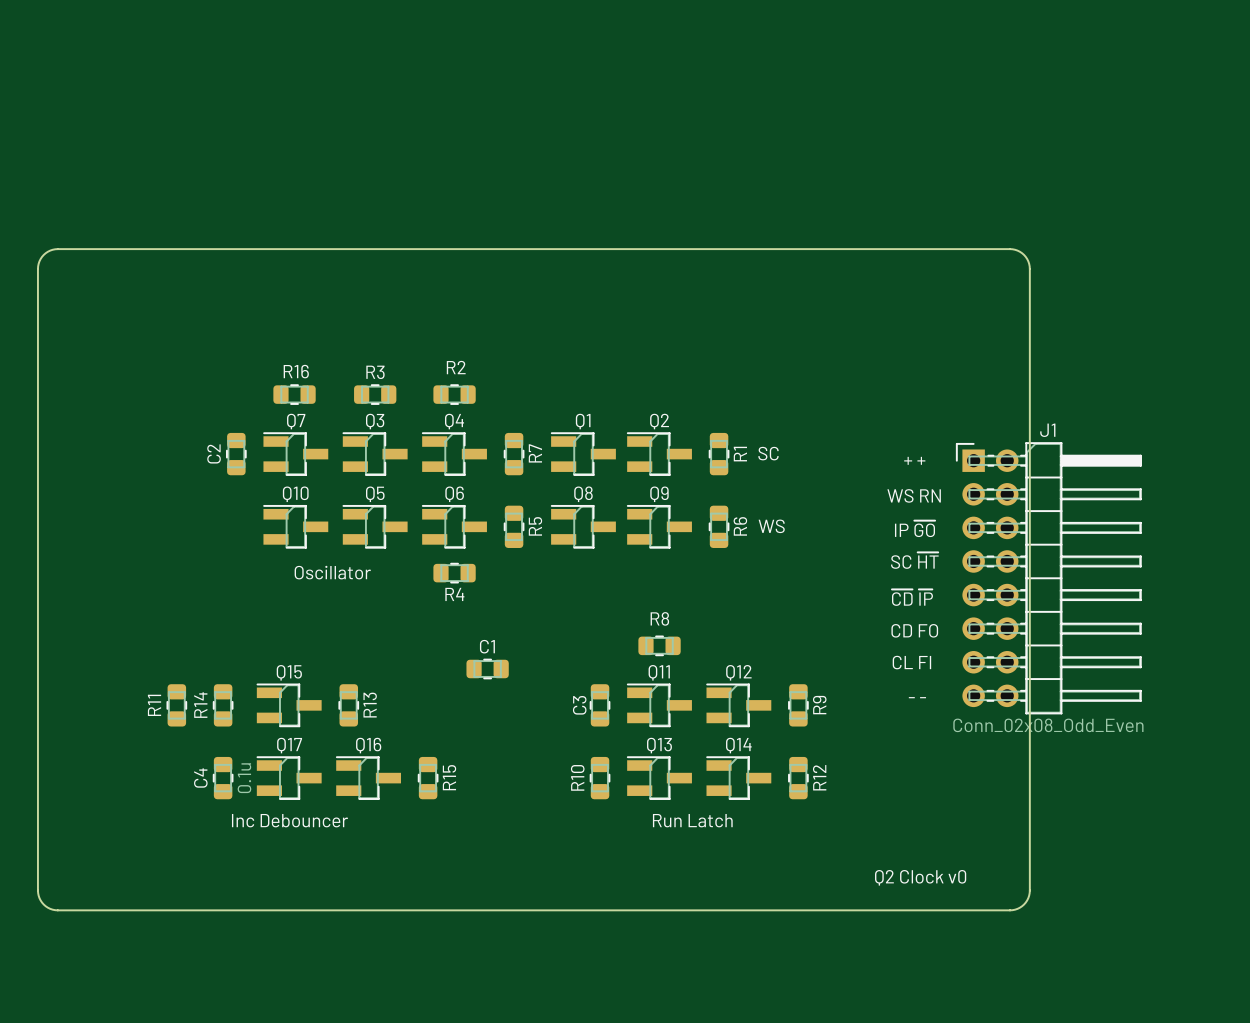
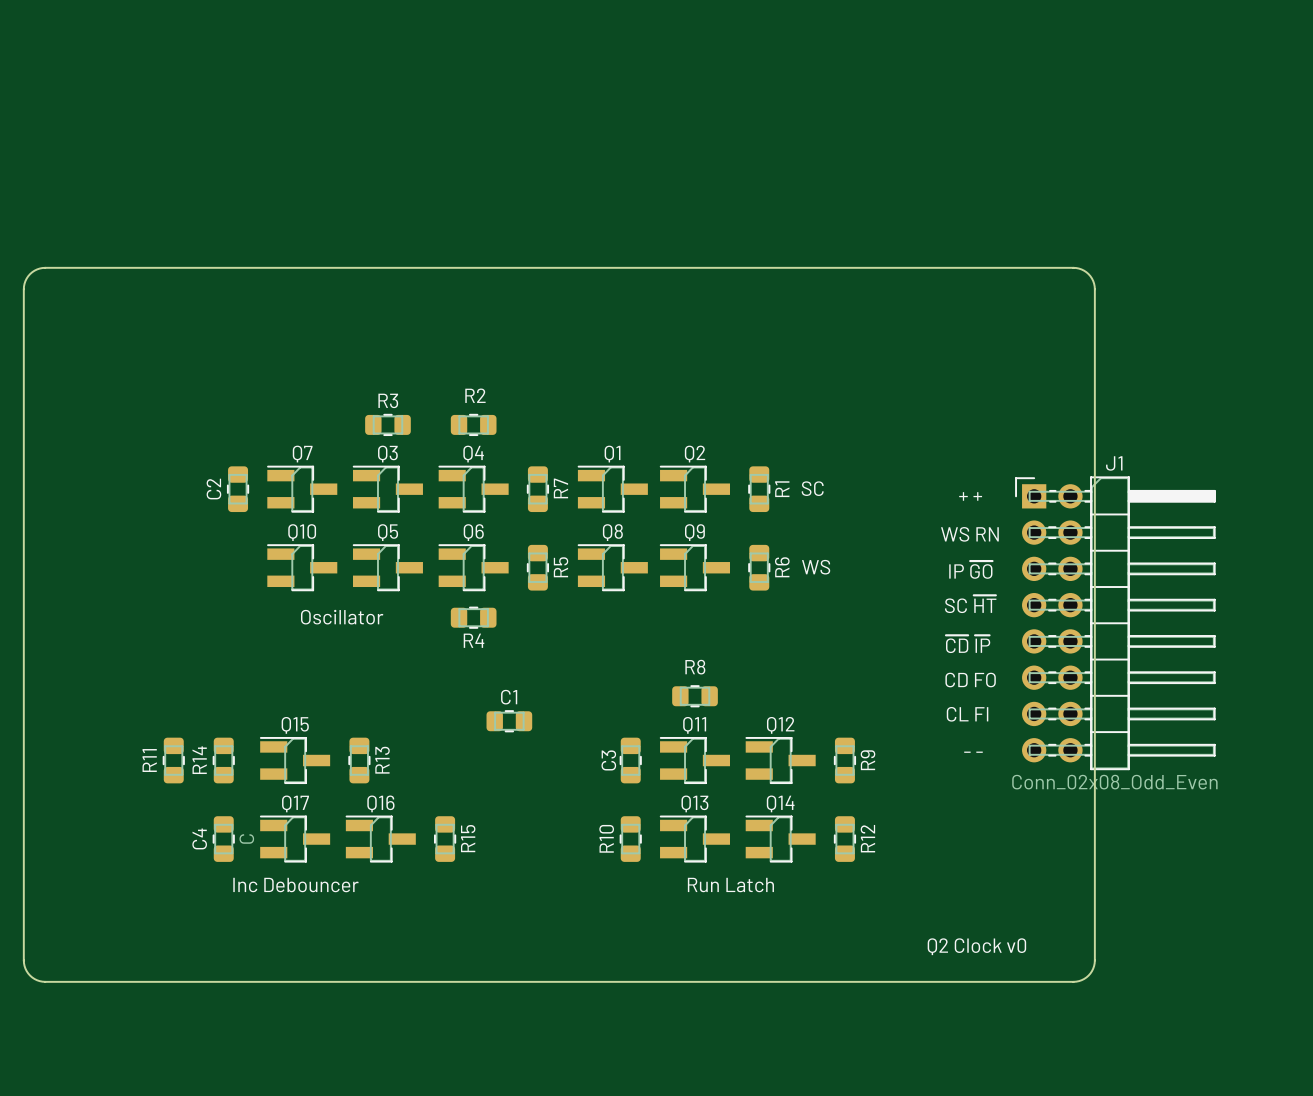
R16: (294, 394) -> none
C4 value: 0.1u (244, 778) -> C (246, 838)

